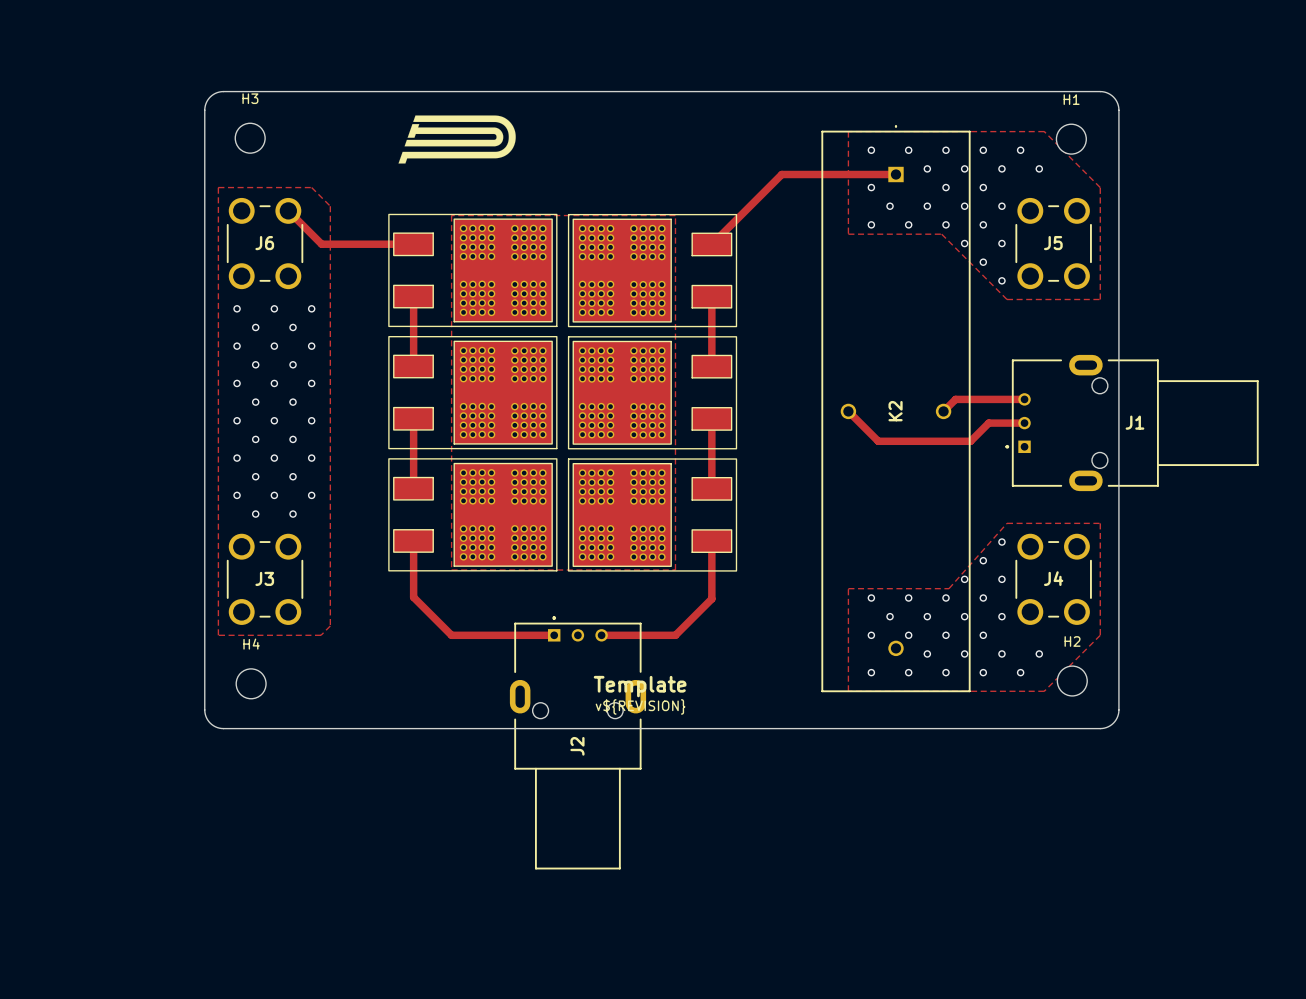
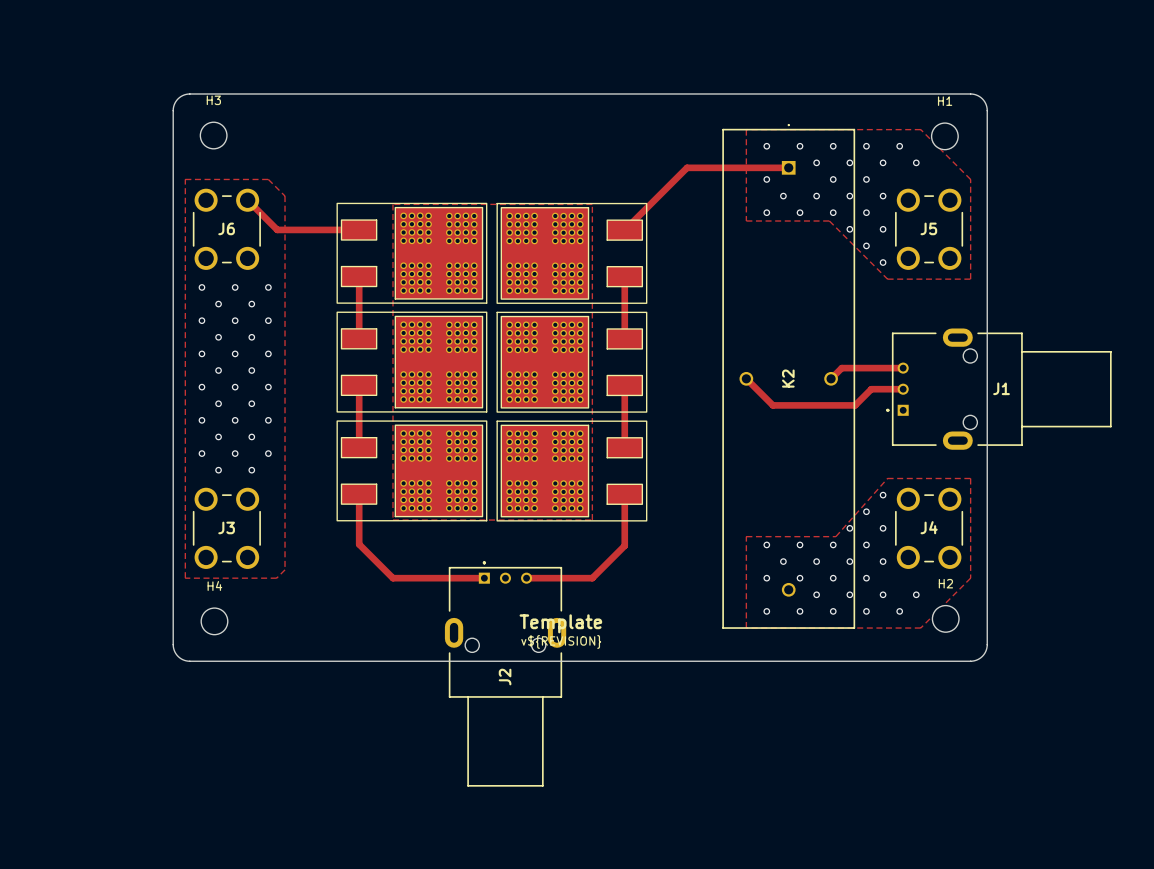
drawing: [398, 115, 516, 164] -> none

